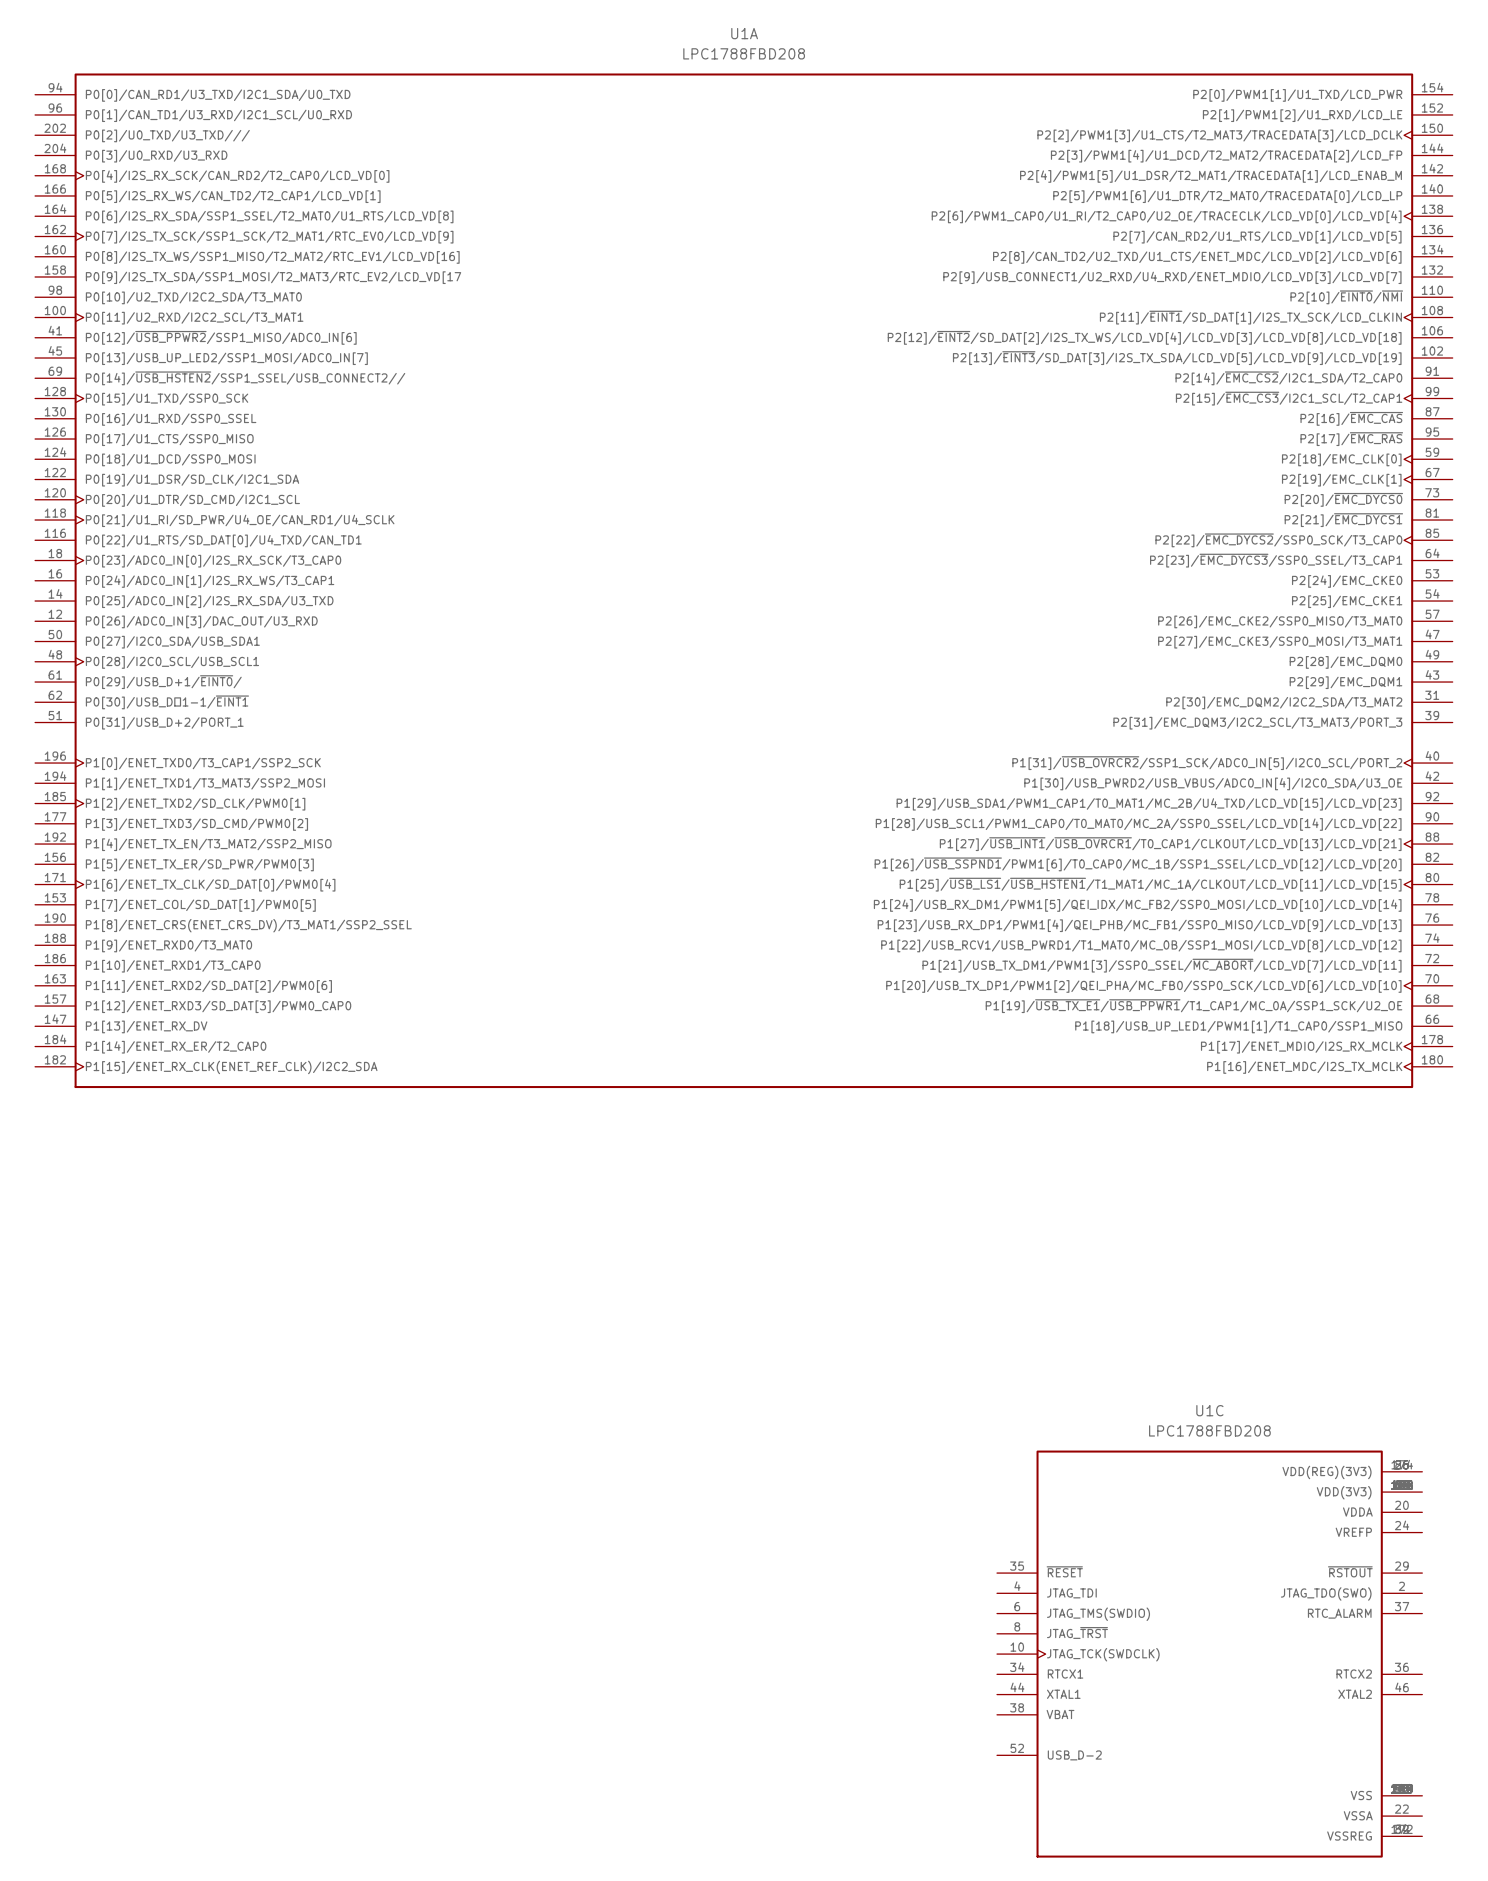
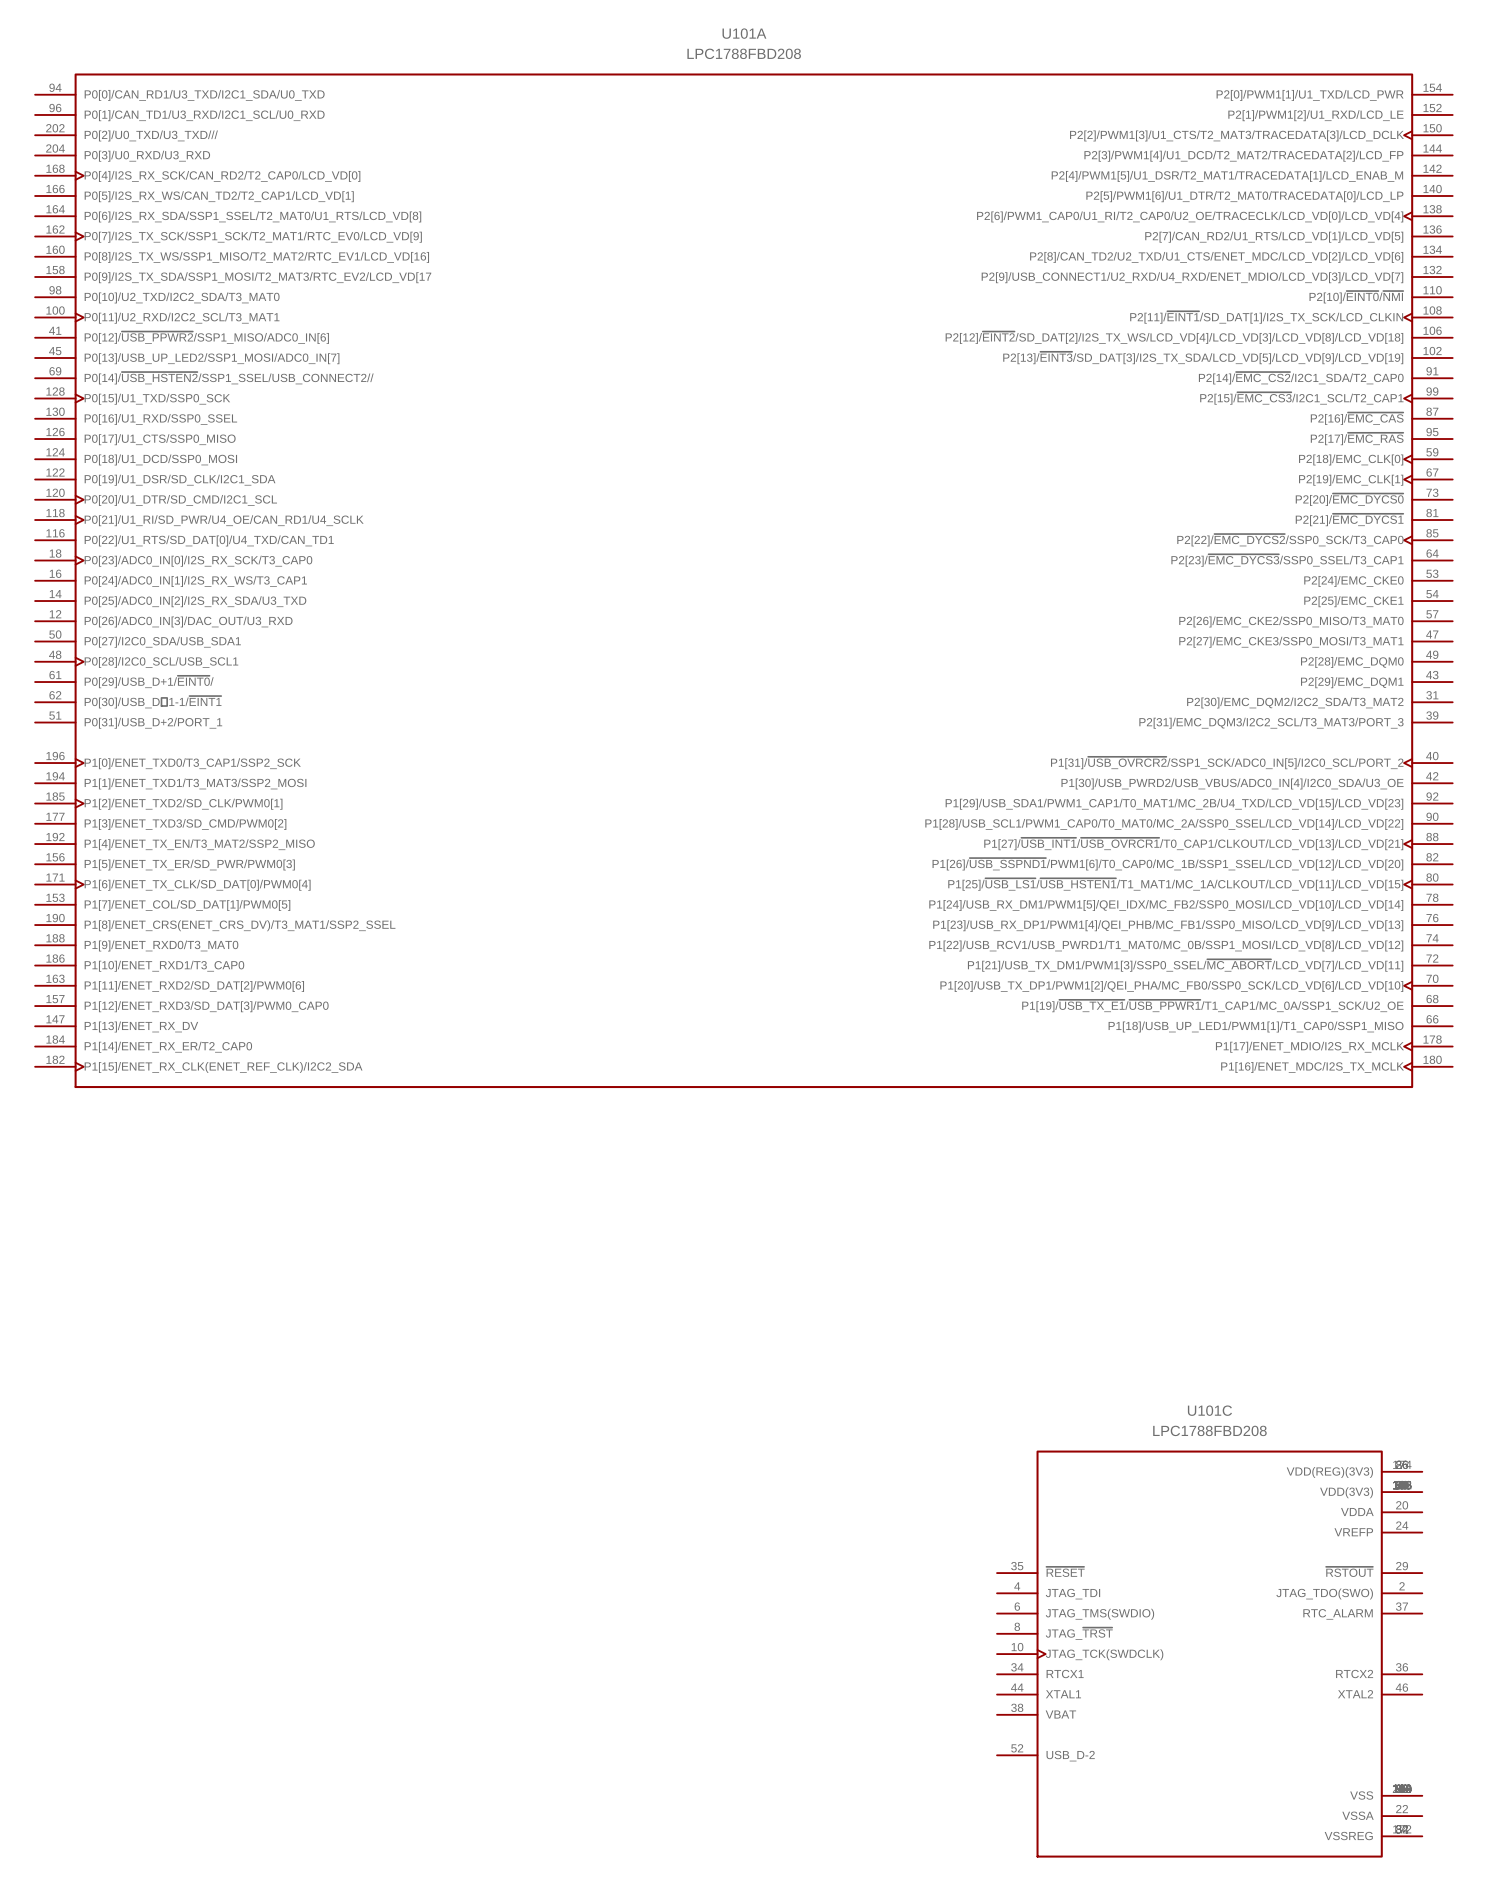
U1A name: U1A (744, 33) -> U101A (744, 33)
U1C name: U1C (1209, 1410) -> U101C (1209, 1410)

